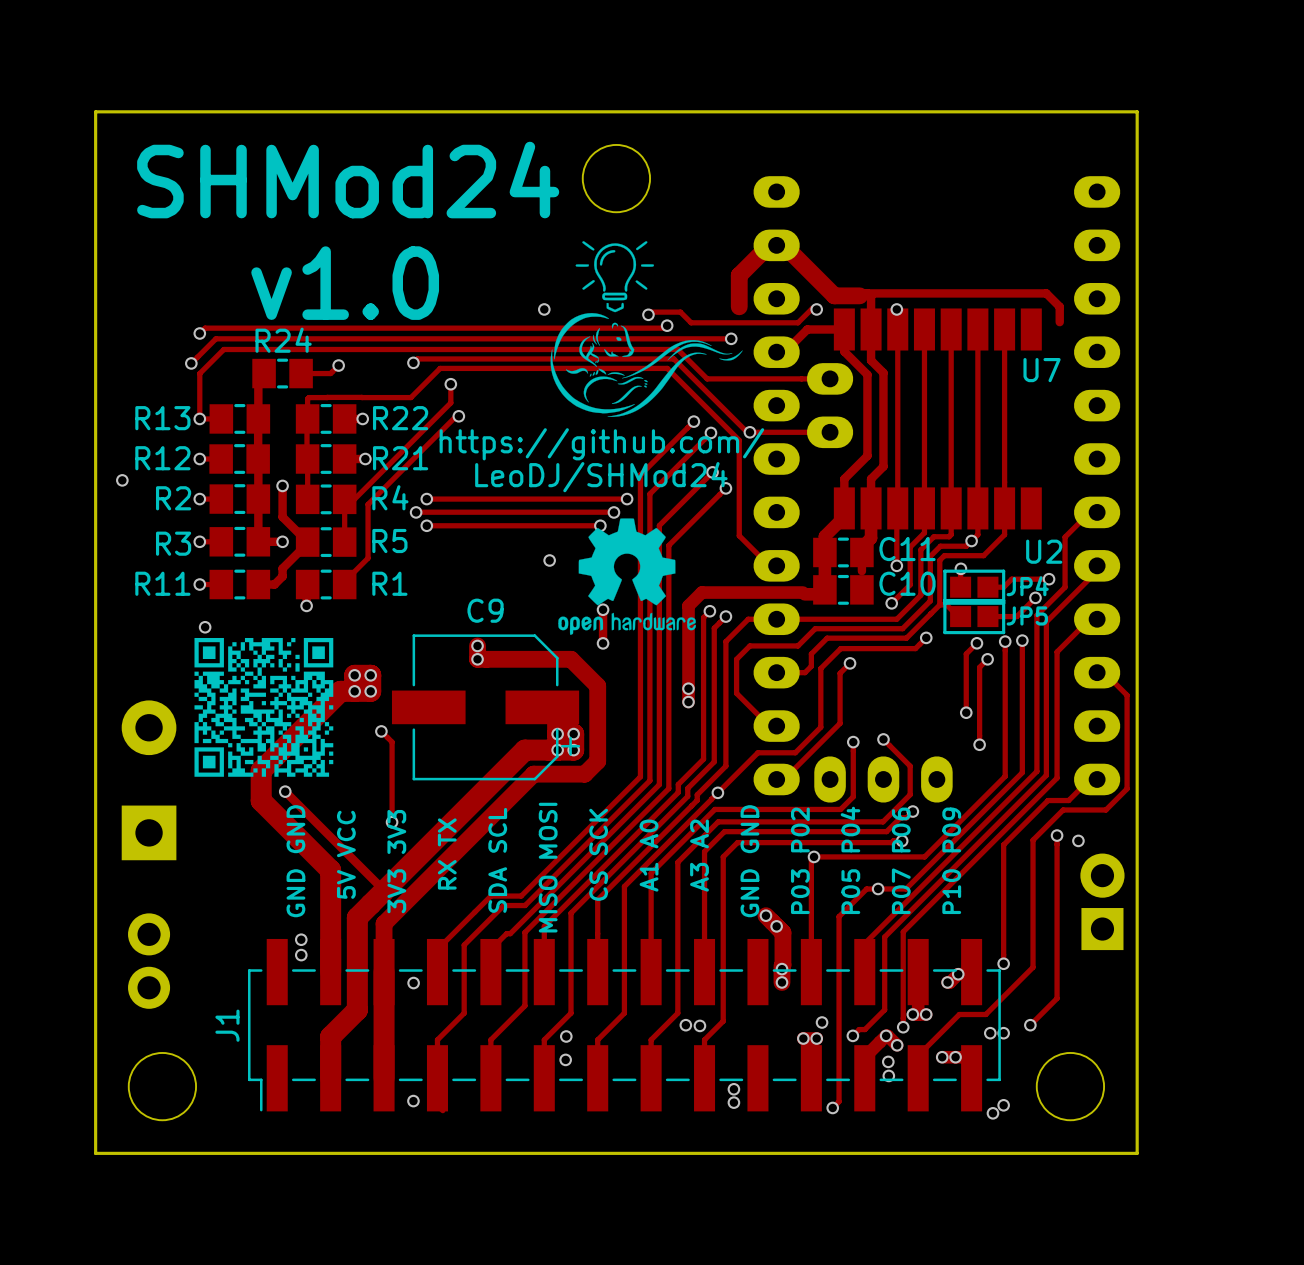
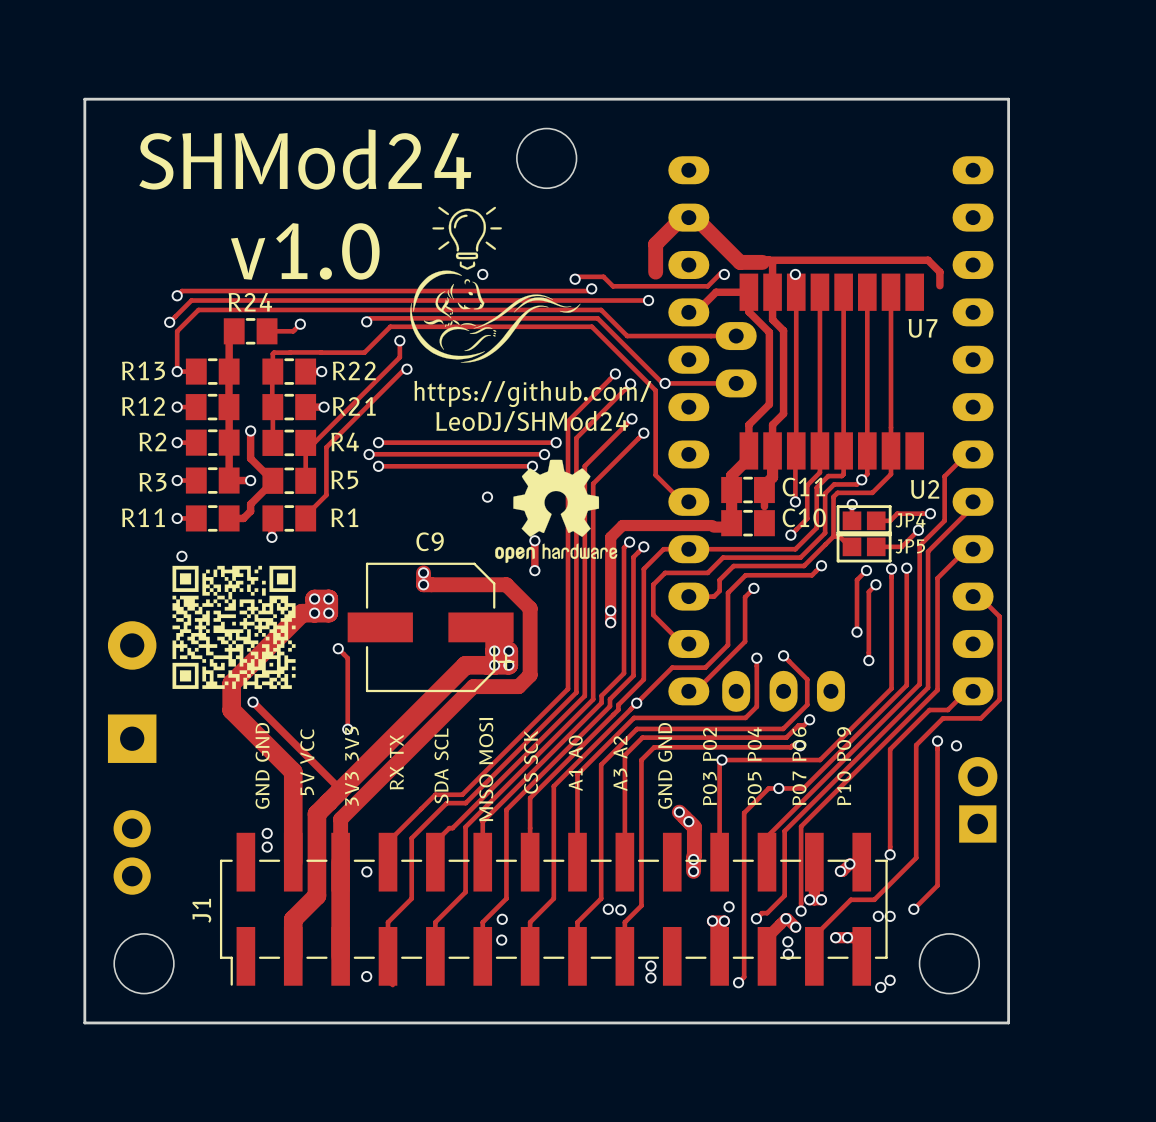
drawing position: (646, 329) -> (495, 284)
via: (122, 480) -> none

